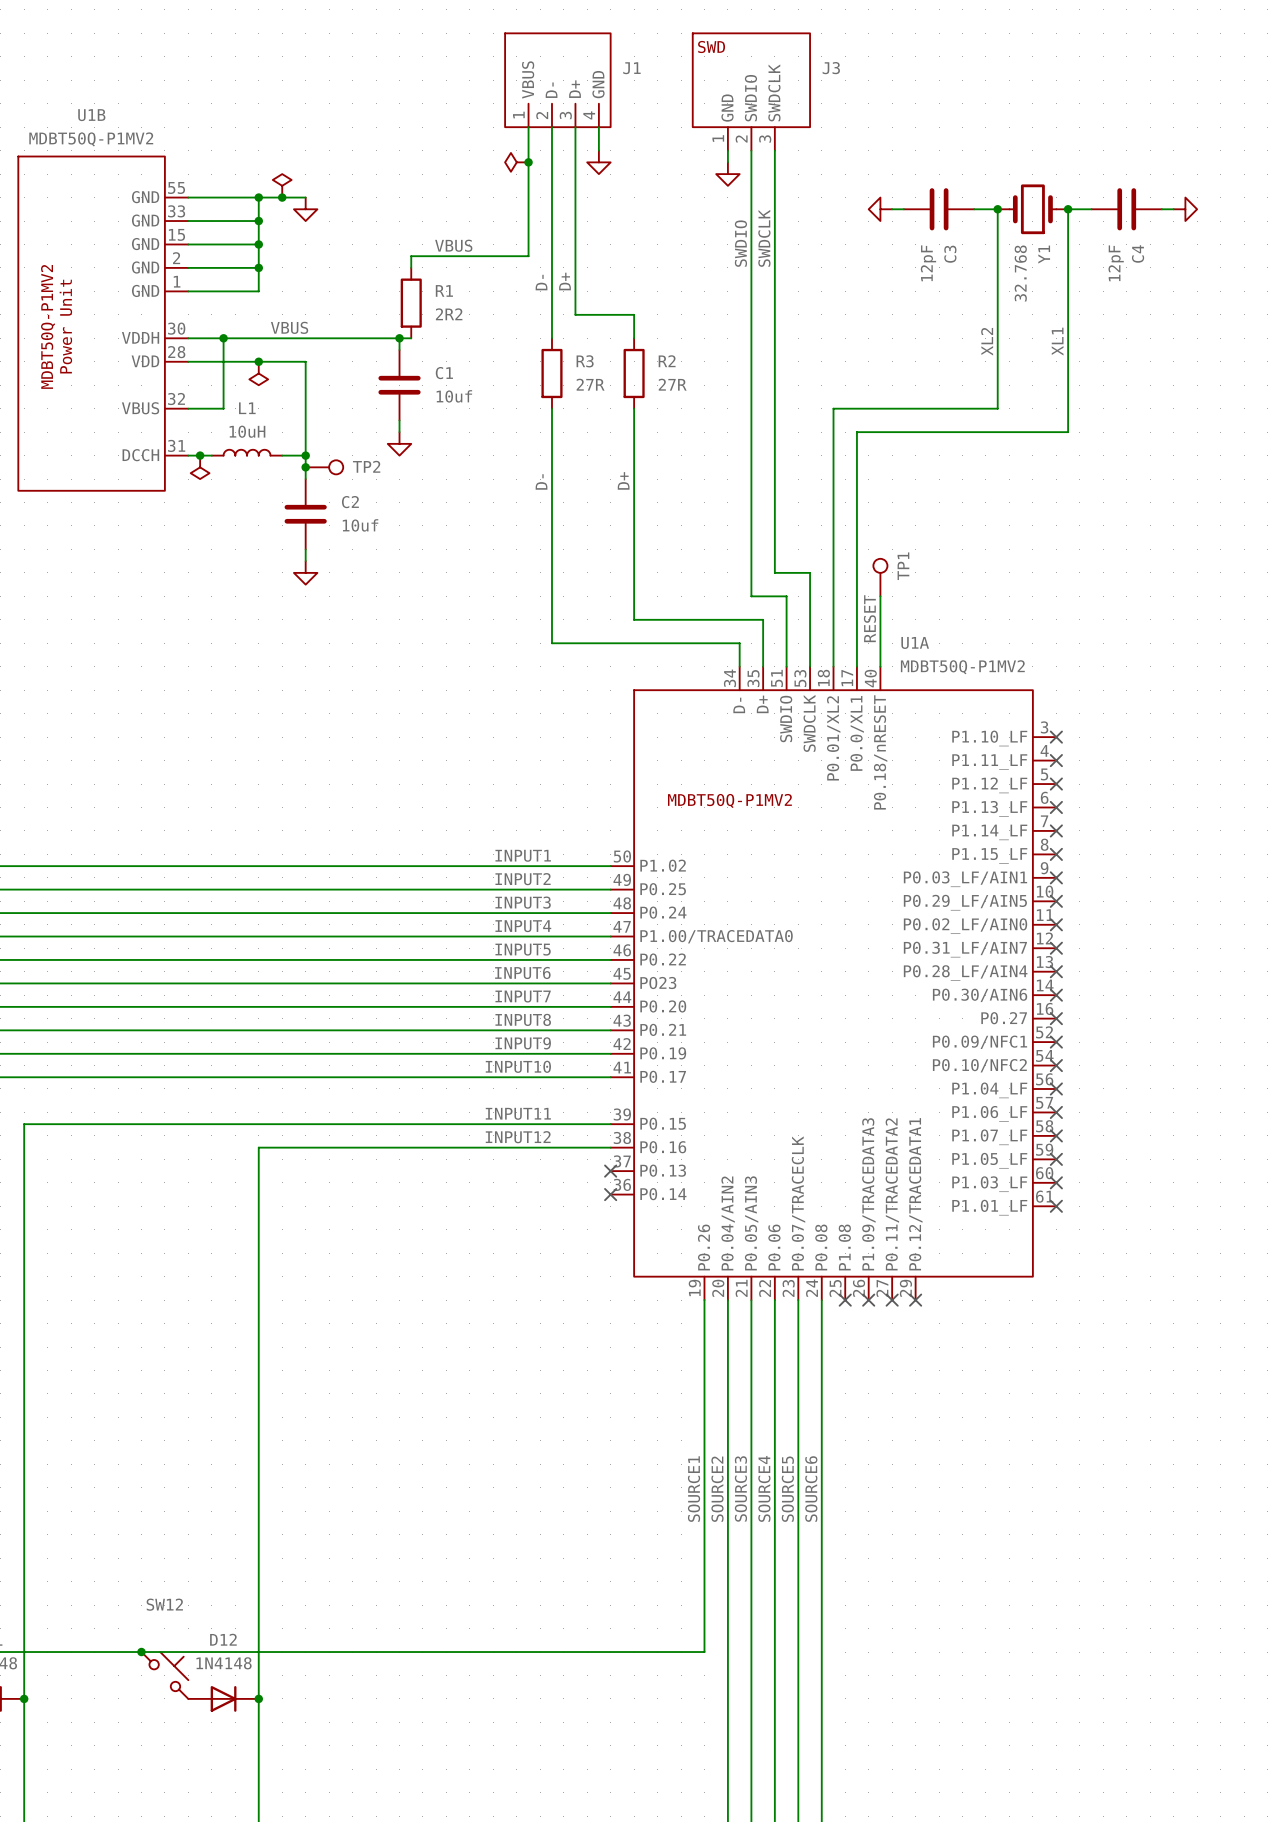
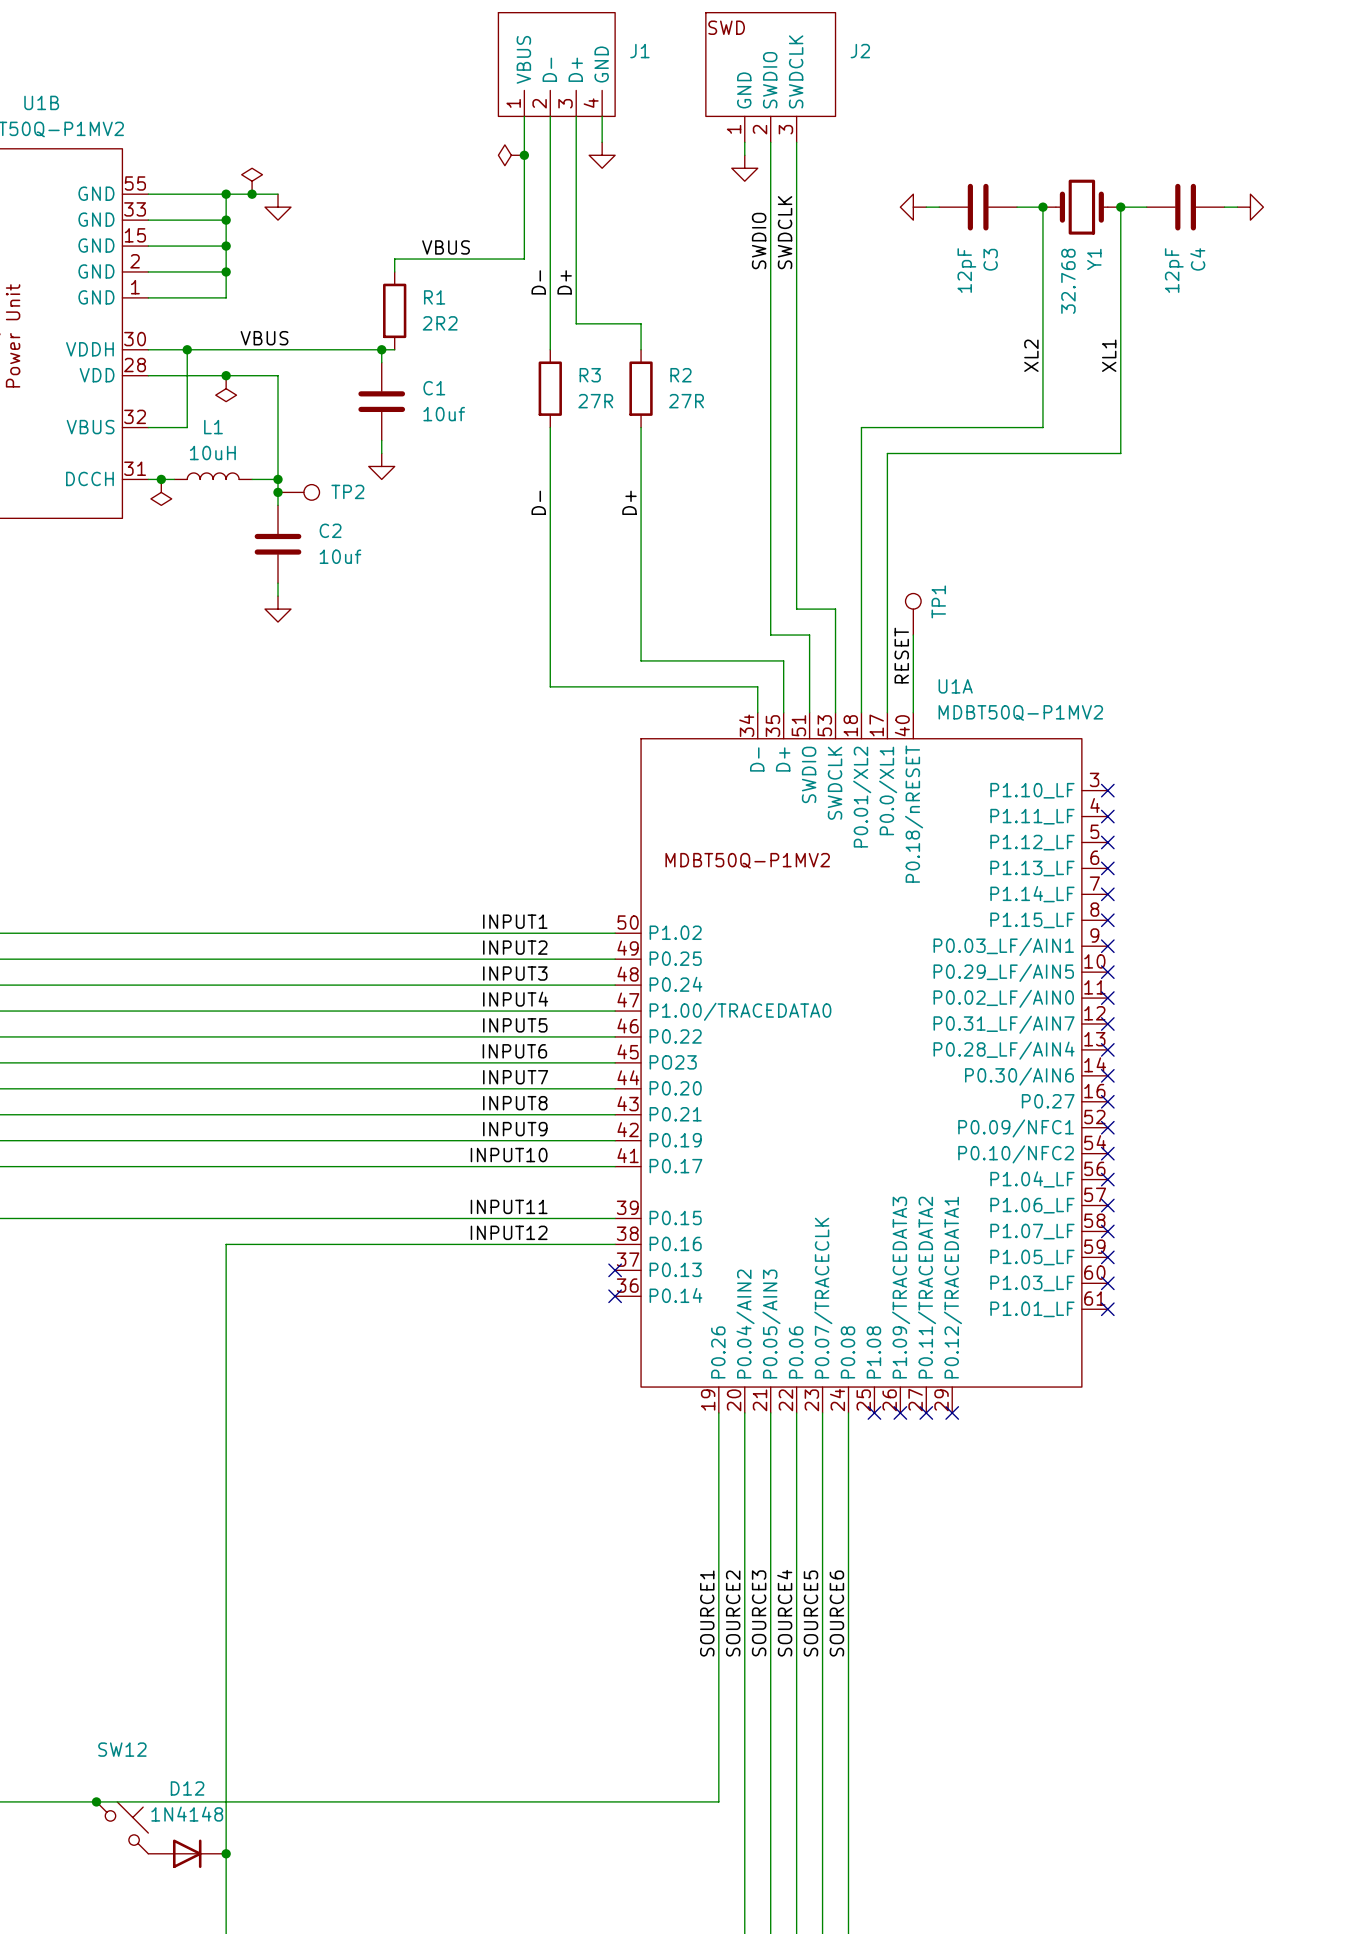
J3 name: J3 (831, 68) -> J2 (860, 51)

